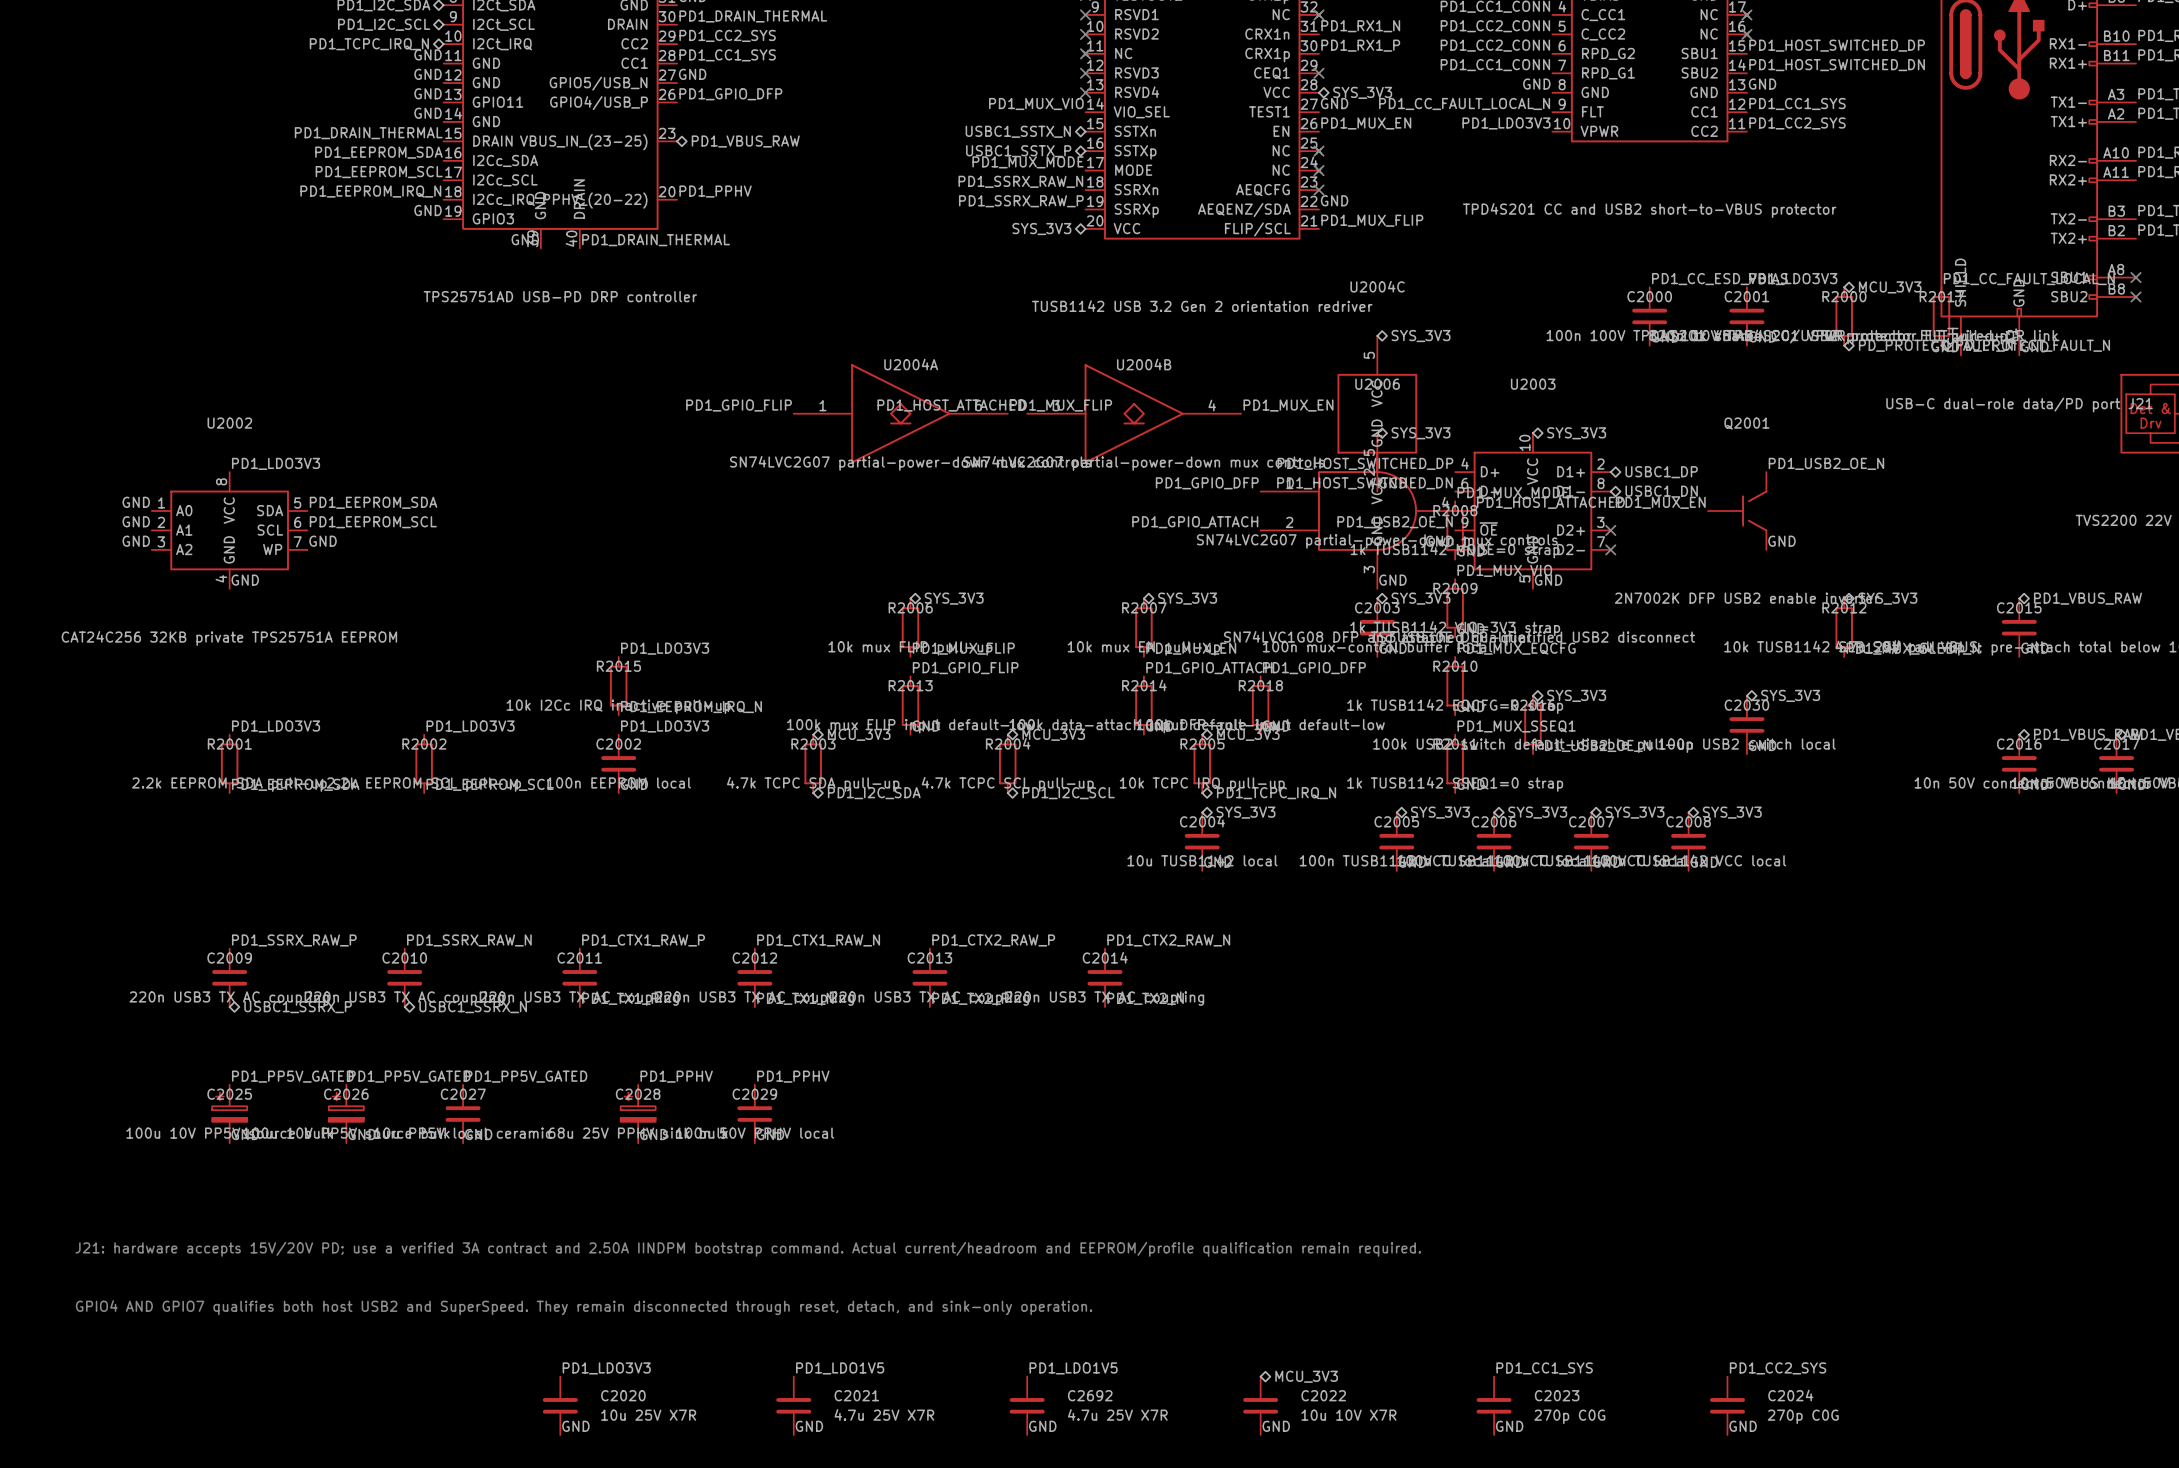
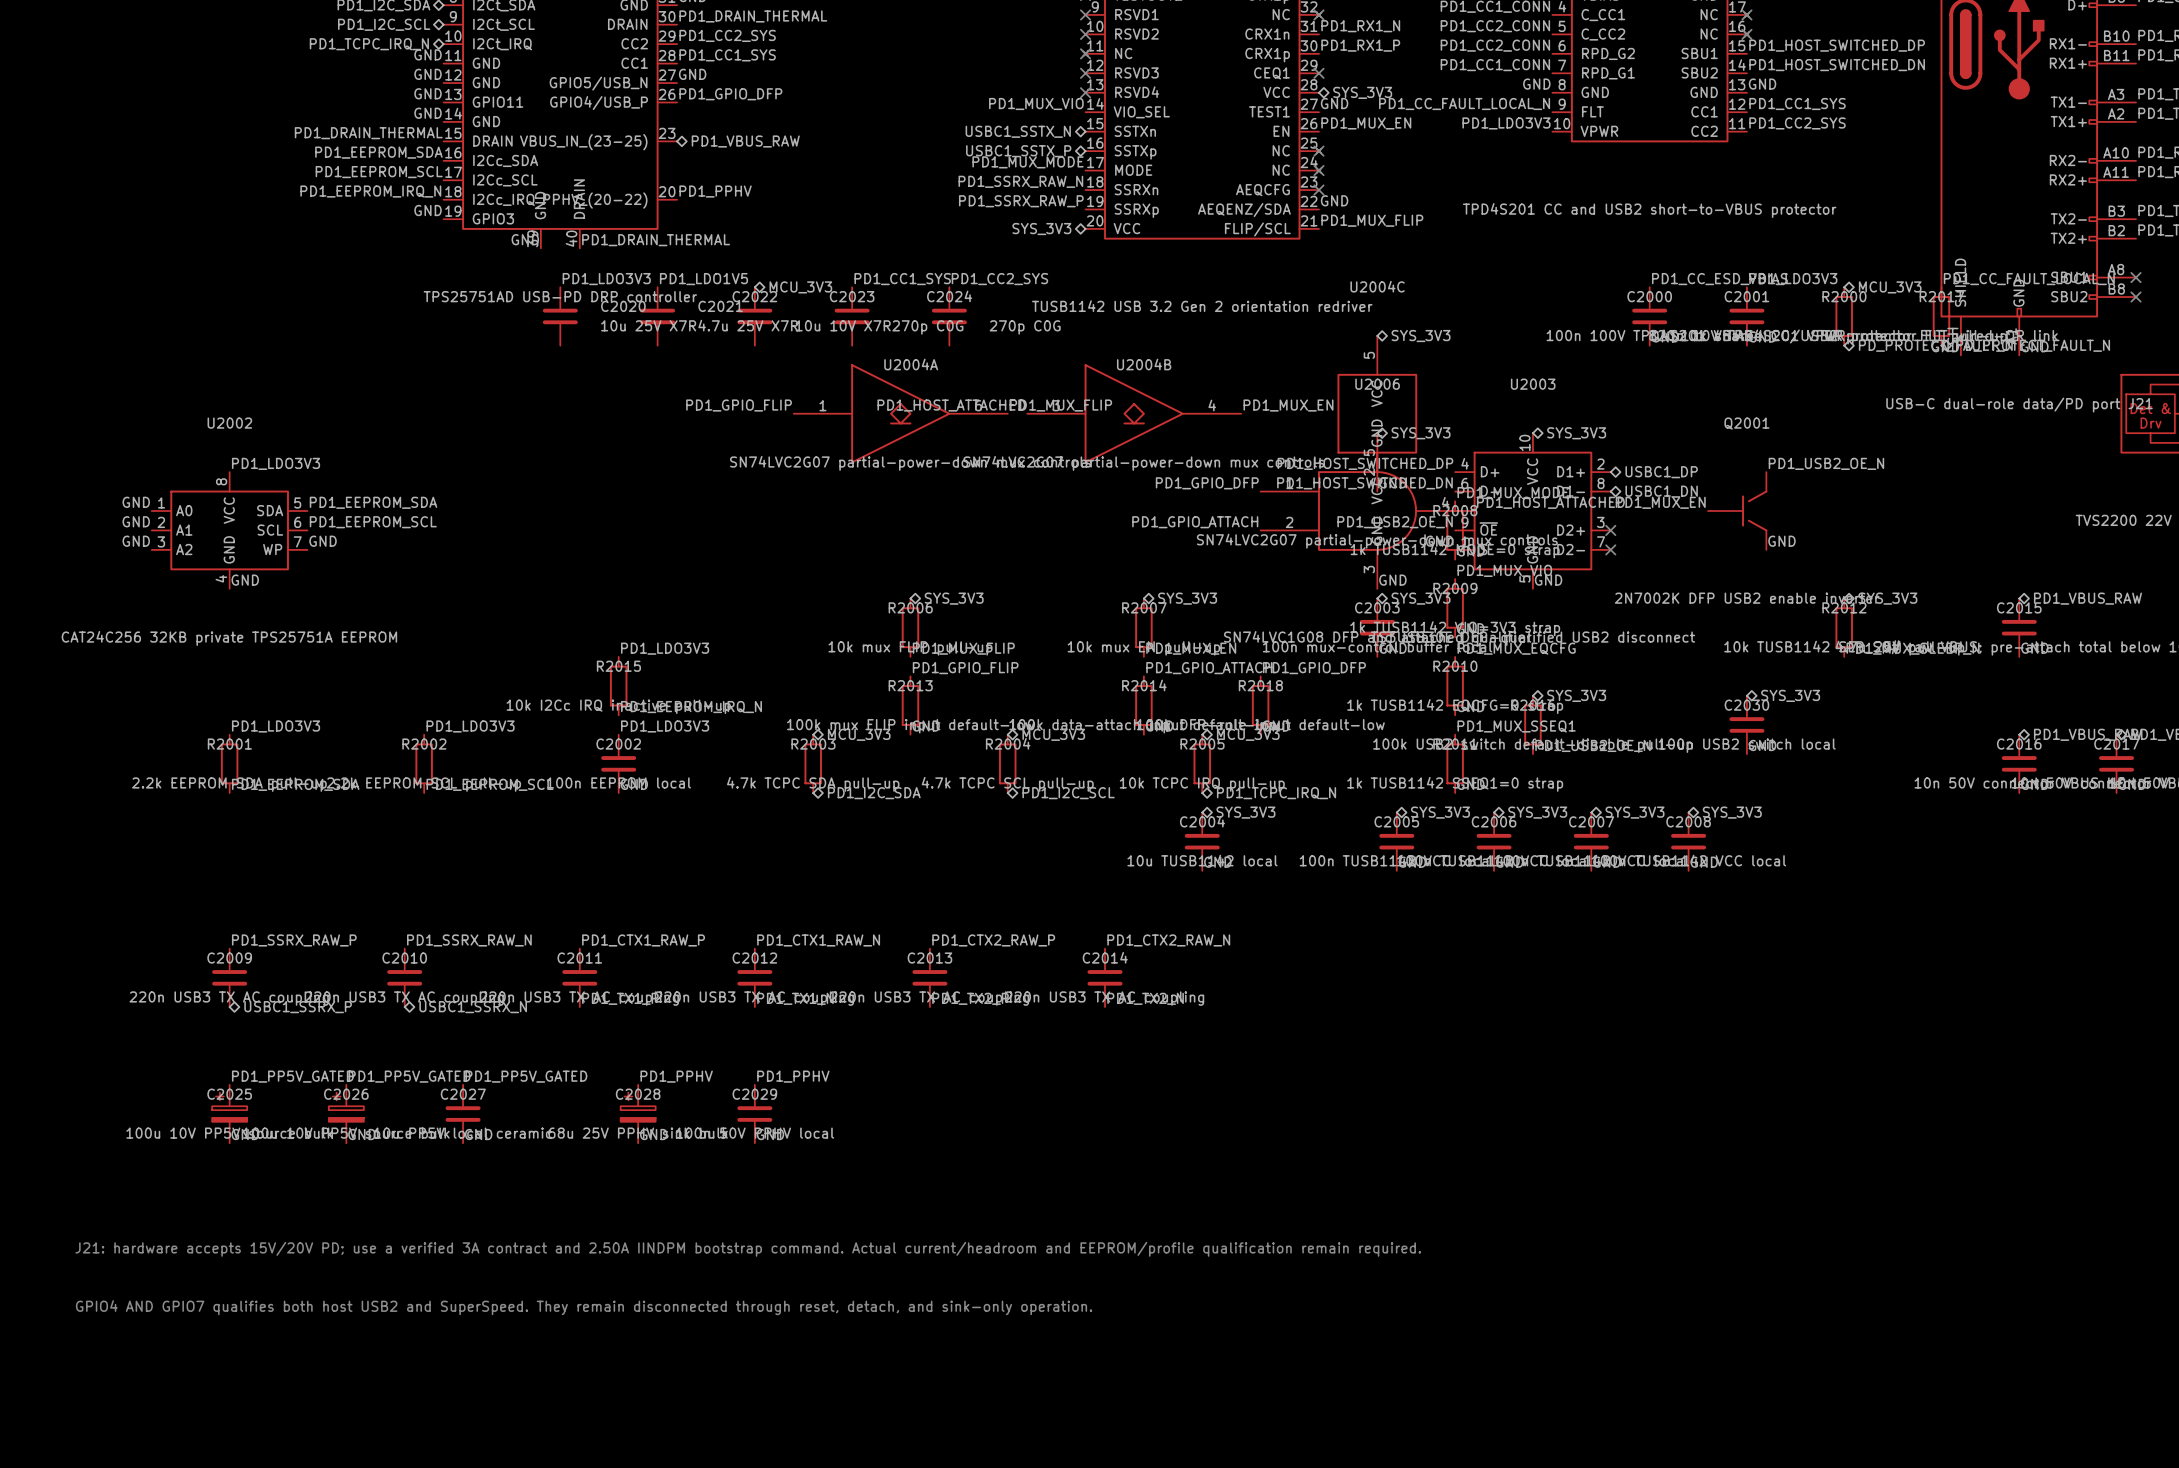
label: none -> PD1_LDO3V3 (606, 279)
label: none -> PD1_LDO1V5 (703, 279)
label: none -> PD1_CC1_SYS (902, 279)
label: none -> PD1_CC2_SYS (999, 279)
hierarchical label: none -> MCU_3V3 (800, 287)
label: PD1_LDO3V3 (606, 1368) -> none
label: PD1_LDO1V5 (840, 1368) -> none
label: PD1_LDO1V5 (1073, 1368) -> none
label: PD1_CC1_SYS (1544, 1368) -> none
label: PD1_CC2_SYS (1778, 1368) -> none
hierarchical label: MCU_3V3 (1306, 1376) -> none
C2022 name position: C2022 (1323, 1395) -> C2022 (754, 296)
C2023 name position: C2023 (1557, 1395) -> C2023 (852, 296)
C2024 name position: C2024 (1790, 1395) -> C2024 (949, 296)
C2020 position: (560, 1405) -> (560, 316)
C2021 position: (793, 1405) -> (657, 316)
C2692: 4.7u 25V X7R (1027, 1405) -> none
C2022 position: (1260, 1405) -> (754, 316)
C2023 position: (1494, 1405) -> (852, 316)
C2024 position: (1727, 1405) -> (949, 316)
label: GND (575, 1426) -> none
label: GND (809, 1426) -> none
label: GND (1042, 1426) -> none
label: GND (1276, 1426) -> none
label: GND (1509, 1426) -> none
label: GND (1743, 1426) -> none

